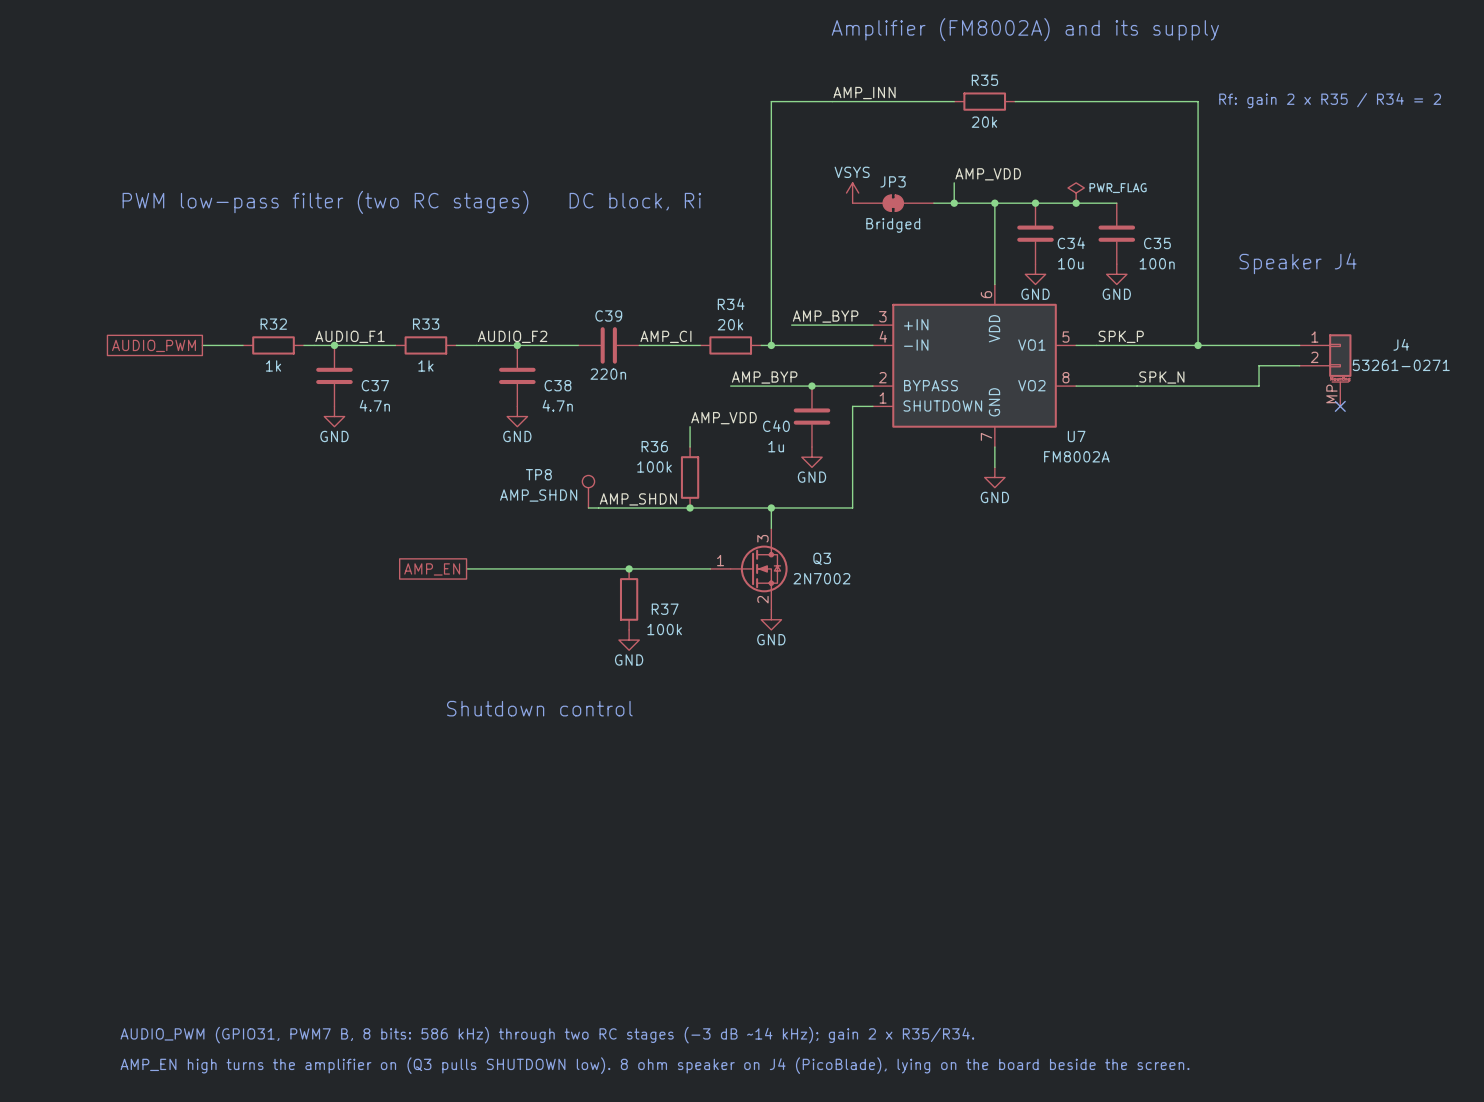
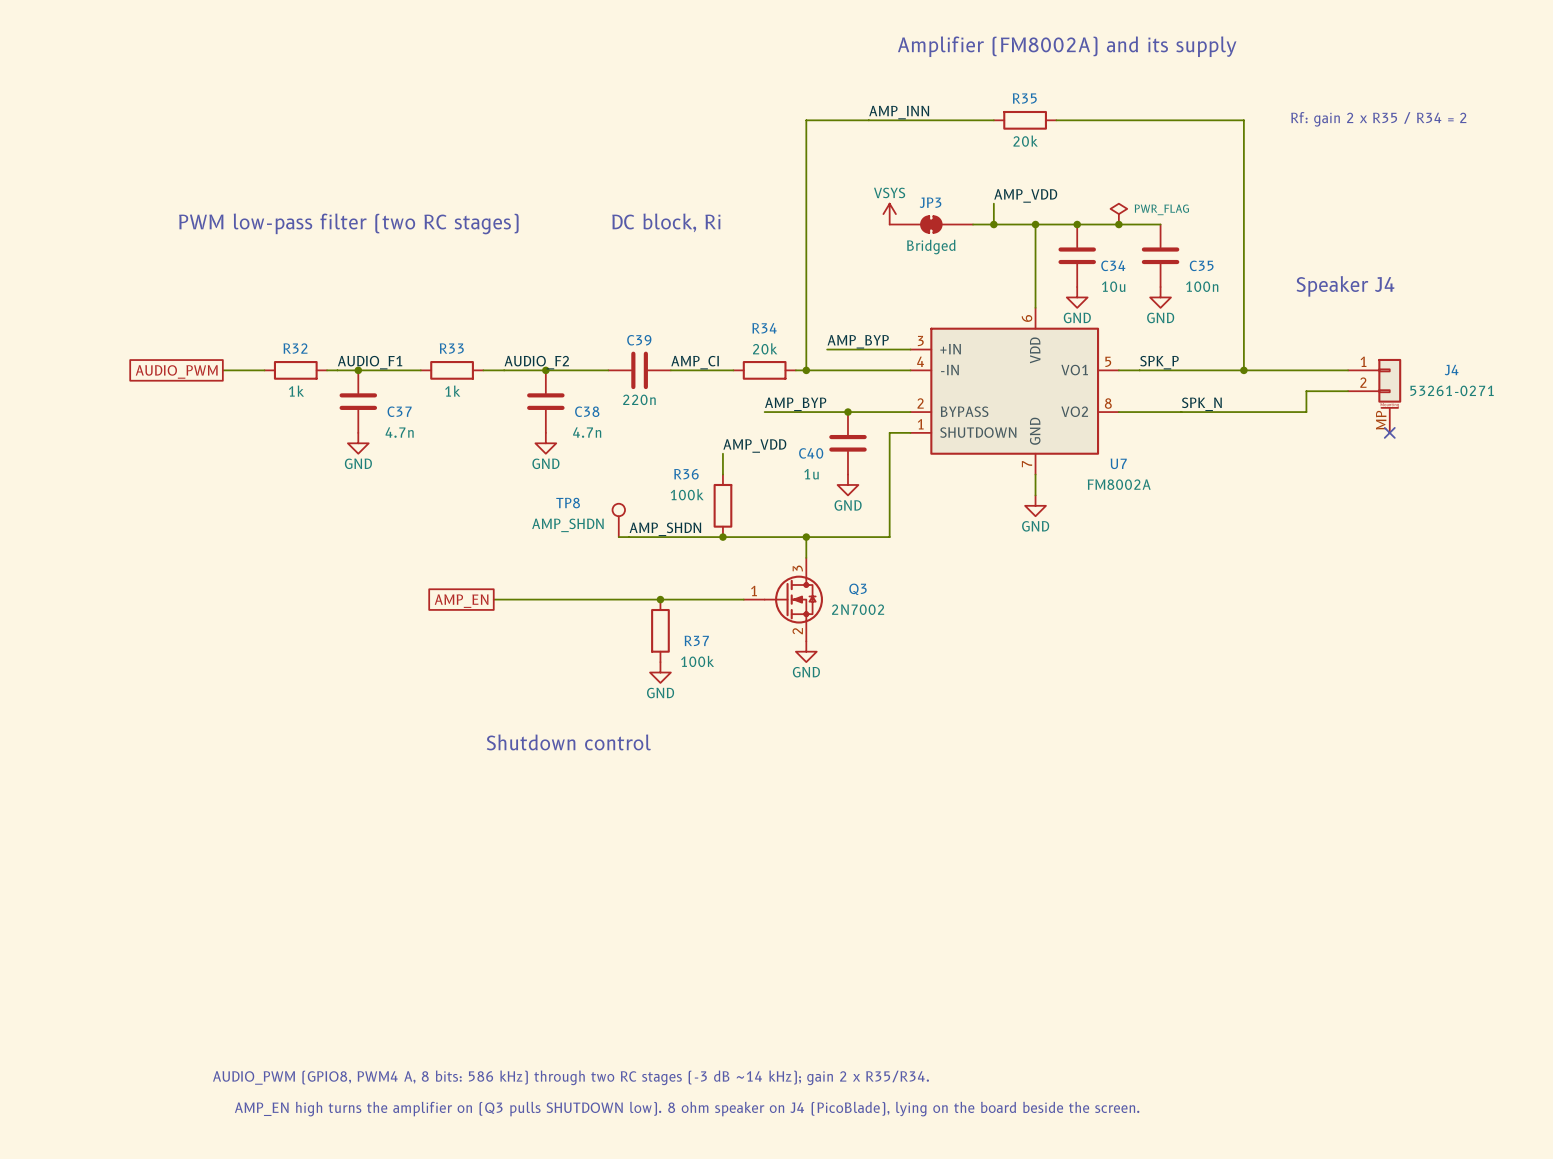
text: AUDIO_PWM (GPIO31, PWM7 B, 8 bits: 586 kHz) through two RC stages (-3 dB ~14 kHz); gain 2 x R35/R34. (547, 1035) -> AUDIO_PWM (GPIO8, PWM4 A, 8 bits: 586 kHz) through two RC stages (-3 dB ~14 kHz); gain 2 x R35/R34. (570, 1077)

